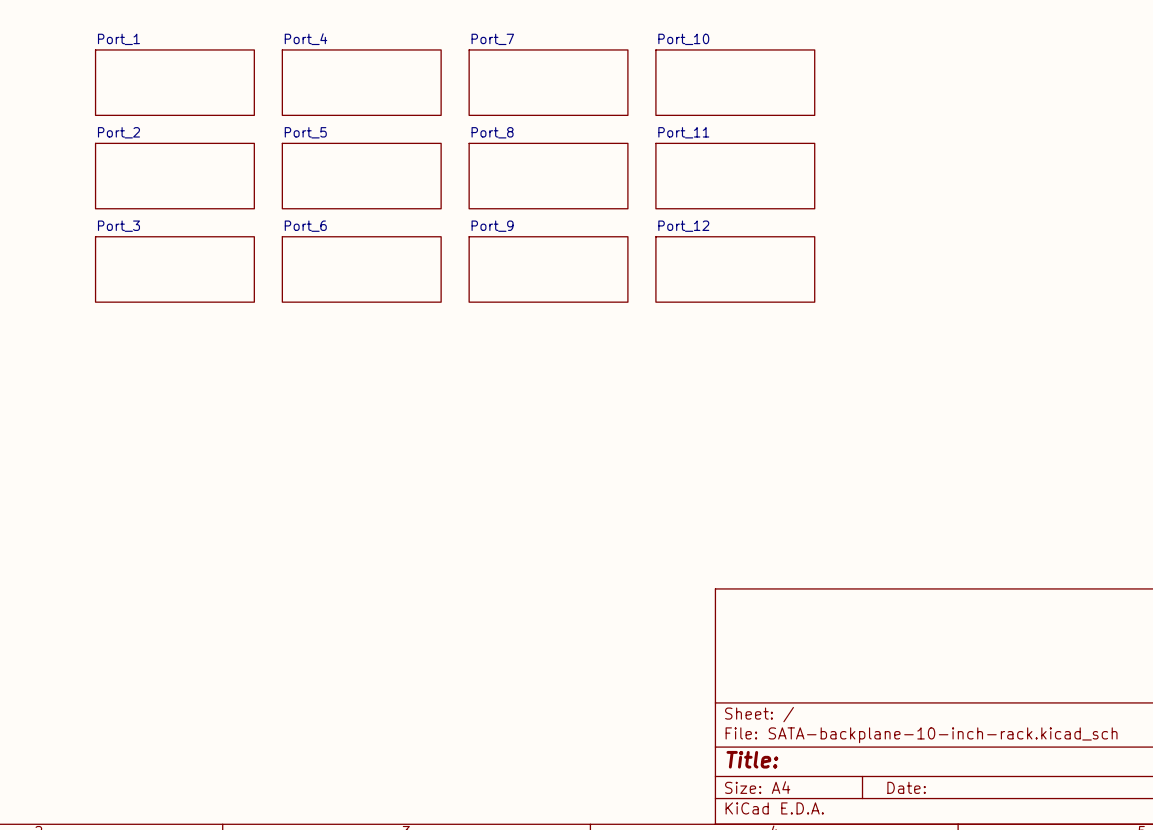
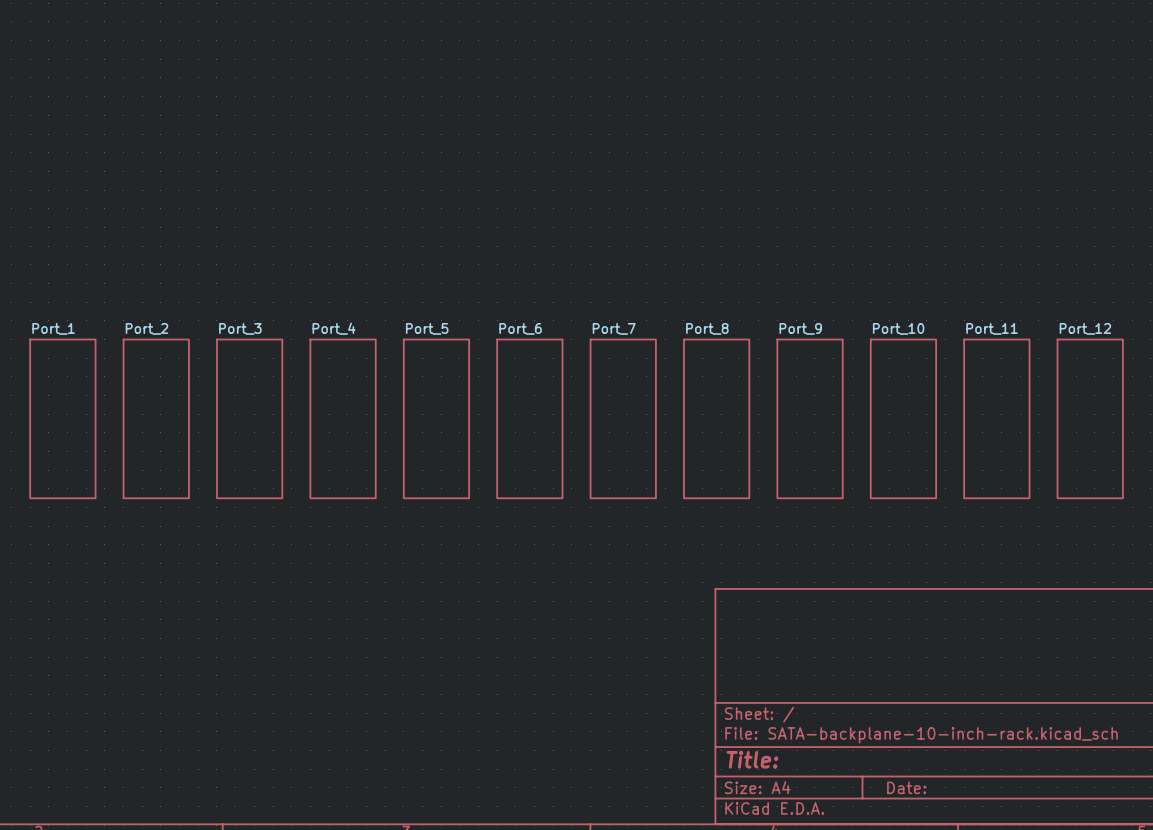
sheet Port_1 name position: Port_1 (118, 39) -> Port_1 (53, 328)
sheet Port_4 name position: Port_4 (305, 39) -> Port_4 (334, 328)
sheet Port_7 name position: Port_7 (492, 39) -> Port_7 (614, 328)
sheet Port_10 name position: Port_10 (683, 39) -> Port_10 (898, 328)
sheet Port_1 rotation: 0° (174, 82) -> 90° clockwise (62, 418)
sheet Port_1 position: (174, 82) -> (62, 418)
sheet Port_4 rotation: 0° (361, 82) -> 90° clockwise (343, 418)
sheet Port_4 position: (361, 82) -> (343, 418)
sheet Port_7 rotation: 0° (548, 82) -> 90° clockwise (623, 418)
sheet Port_7 position: (548, 82) -> (623, 418)
sheet Port_10 rotation: 0° (735, 82) -> 90° clockwise (903, 418)
sheet Port_10 position: (735, 82) -> (903, 418)
sheet Port_2 name position: Port_2 (118, 132) -> Port_2 (146, 328)
sheet Port_5 name position: Port_5 (305, 132) -> Port_5 (427, 328)
sheet Port_8 name position: Port_8 (492, 132) -> Port_8 (707, 328)
sheet Port_11 name position: Port_11 (683, 132) -> Port_11 (992, 328)
sheet Port_2 rotation: 0° (174, 176) -> 90° clockwise (156, 418)
sheet Port_2 position: (174, 176) -> (156, 418)
sheet Port_5 rotation: 0° (361, 176) -> 90° clockwise (436, 418)
sheet Port_5 position: (361, 176) -> (436, 418)
sheet Port_8 rotation: 0° (548, 176) -> 90° clockwise (716, 418)
sheet Port_8 position: (548, 176) -> (716, 418)
sheet Port_11 rotation: 0° (735, 176) -> 90° clockwise (996, 418)
sheet Port_11 position: (735, 176) -> (996, 418)
sheet Port_3 name position: Port_3 (118, 226) -> Port_3 (240, 328)
sheet Port_6 name position: Port_6 (305, 226) -> Port_6 (520, 328)
sheet Port_9 name position: Port_9 (492, 226) -> Port_9 (800, 328)
sheet Port_12 name position: Port_12 (683, 226) -> Port_12 (1085, 328)
sheet Port_3 rotation: 0° (174, 269) -> 90° clockwise (249, 418)
sheet Port_3 position: (174, 269) -> (249, 418)
sheet Port_6 rotation: 0° (361, 269) -> 90° clockwise (529, 418)
sheet Port_6 position: (361, 269) -> (529, 418)
sheet Port_9 rotation: 0° (548, 269) -> 90° clockwise (810, 418)
sheet Port_9 position: (548, 269) -> (810, 418)
sheet Port_12 rotation: 0° (735, 269) -> 90° clockwise (1090, 418)
sheet Port_12 position: (735, 269) -> (1090, 418)

